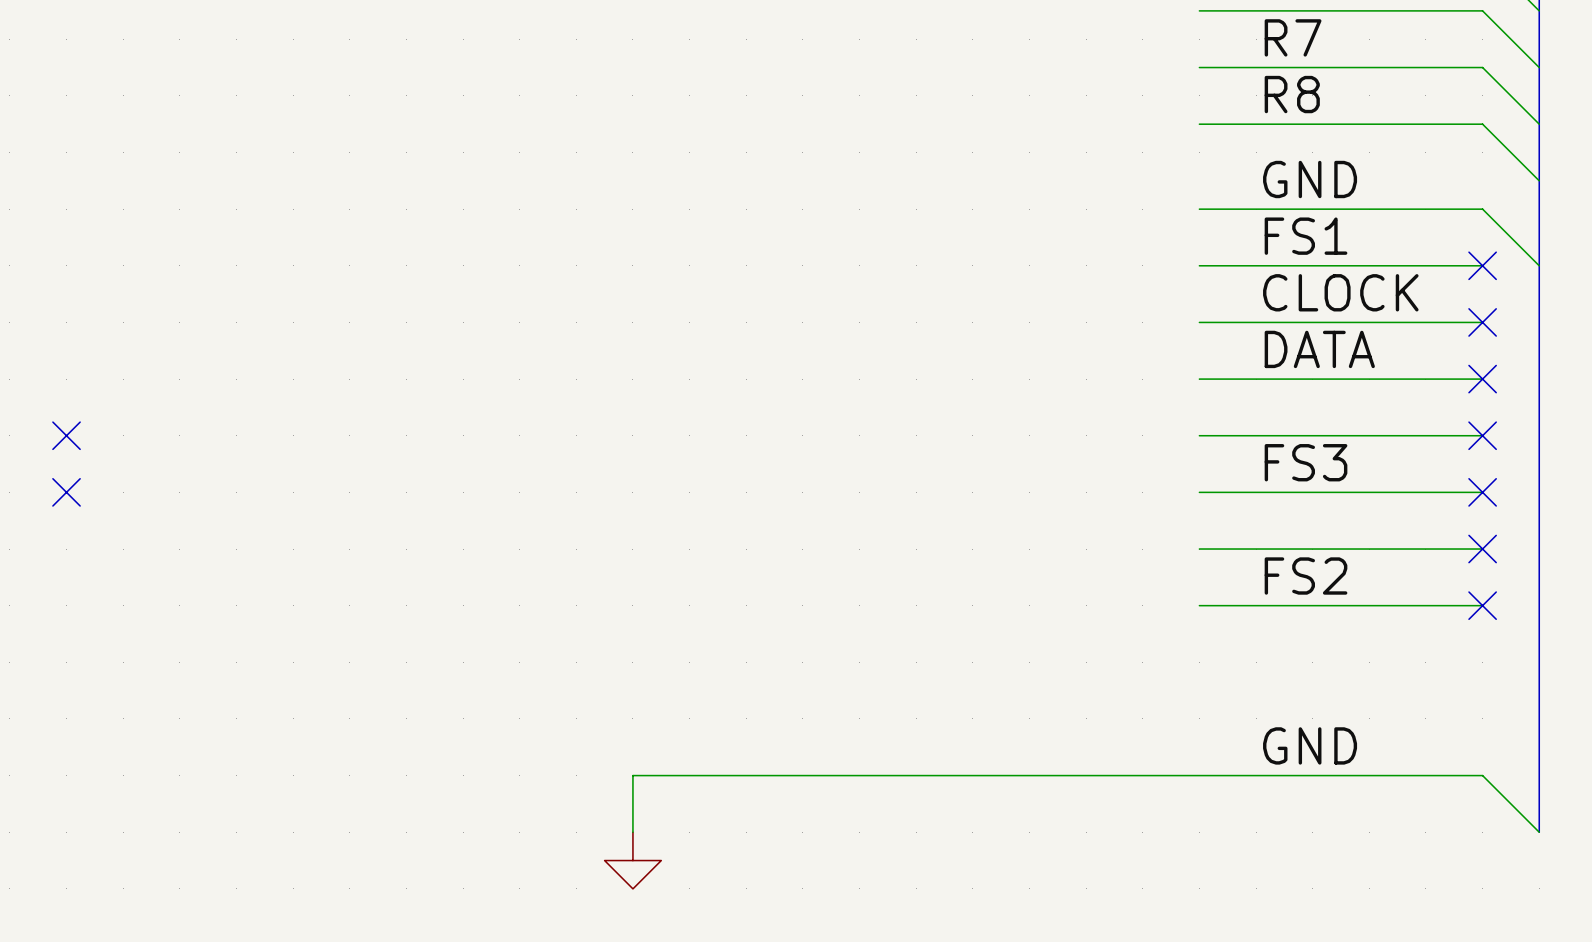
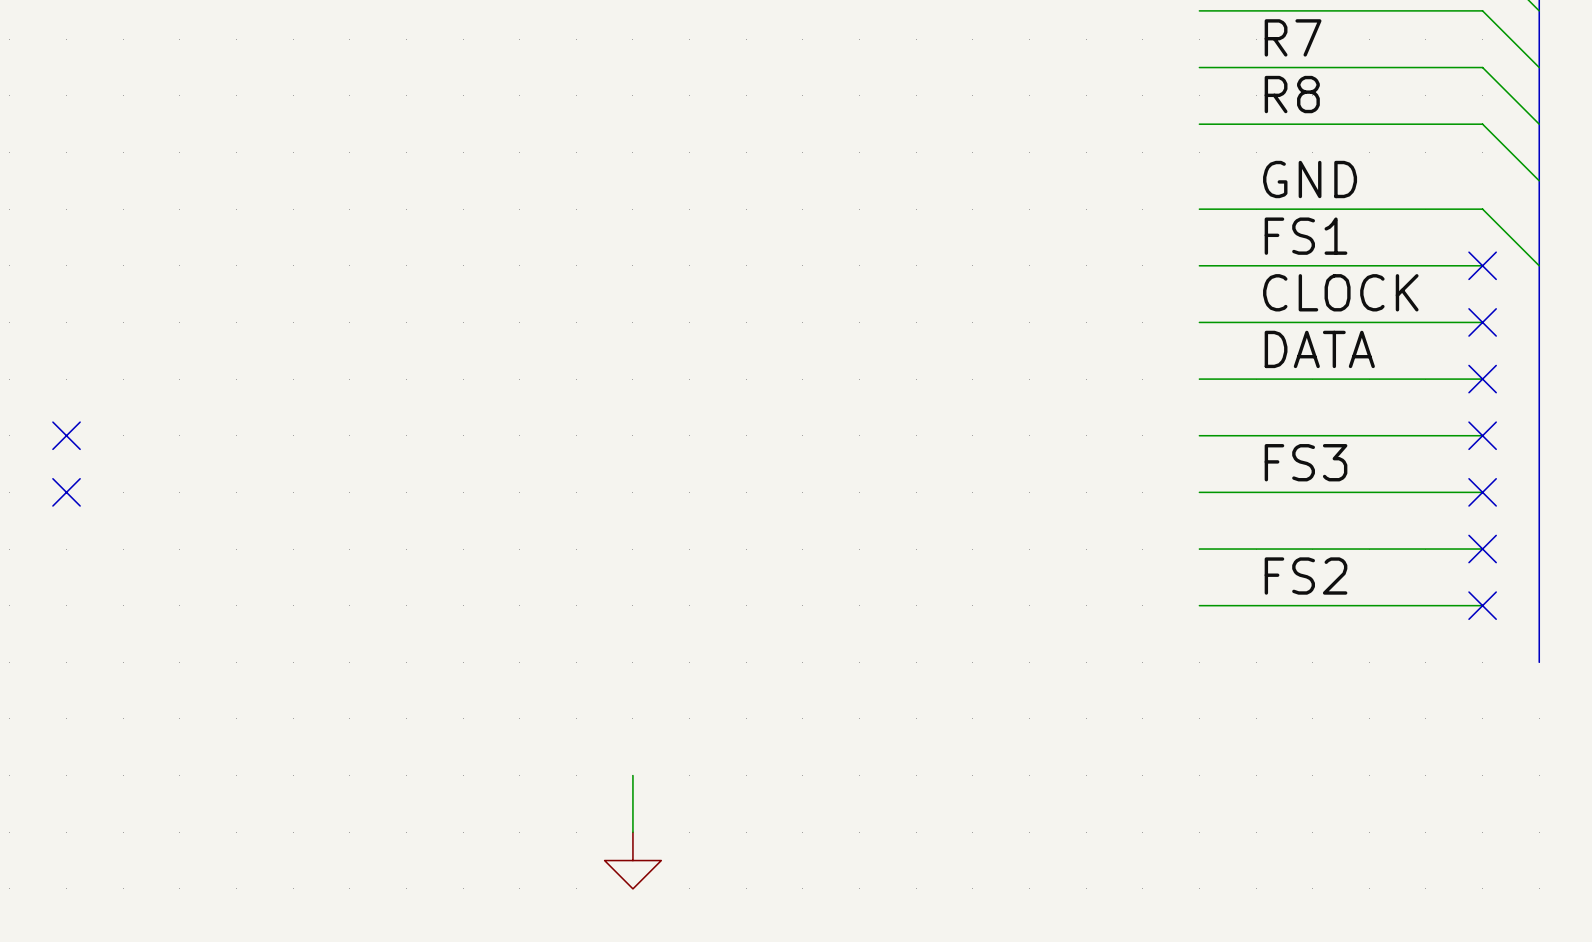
bus: (1539, 662) (1539, 832) -> none
label: GND (1310, 745) -> none
wire: (632, 775) (1482, 775) (1539, 832) -> none

